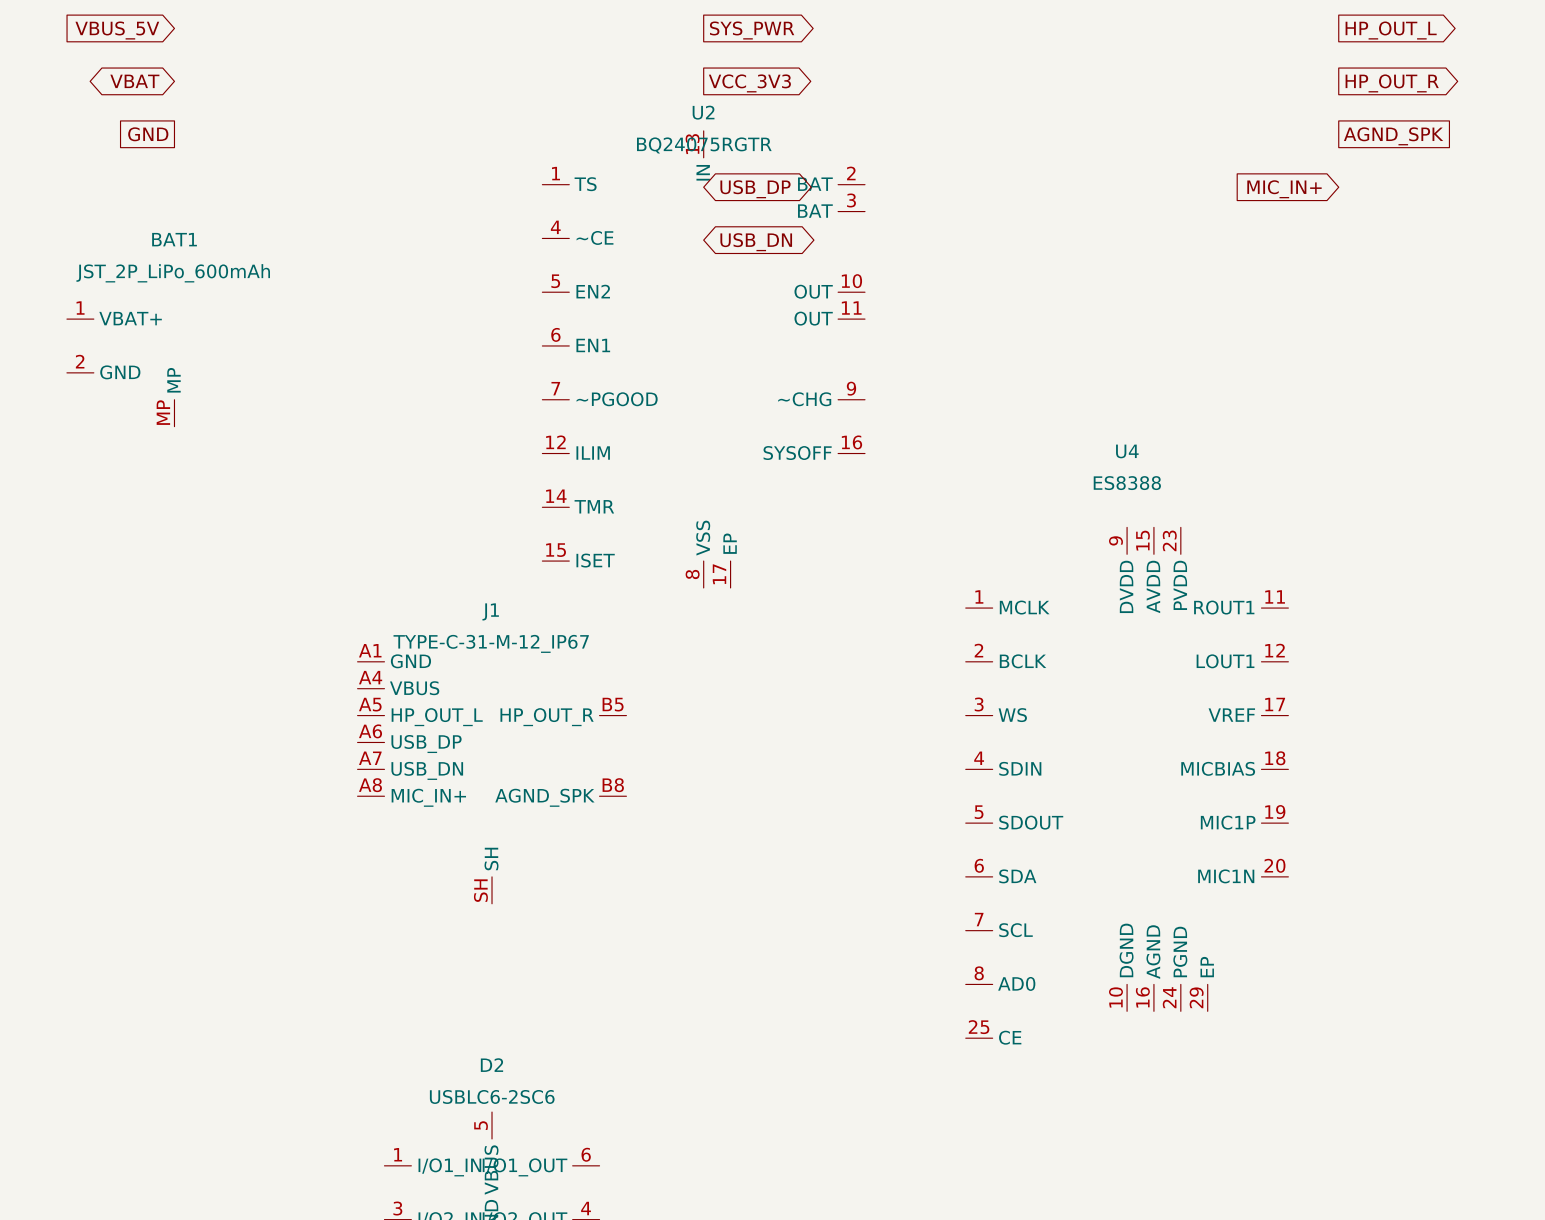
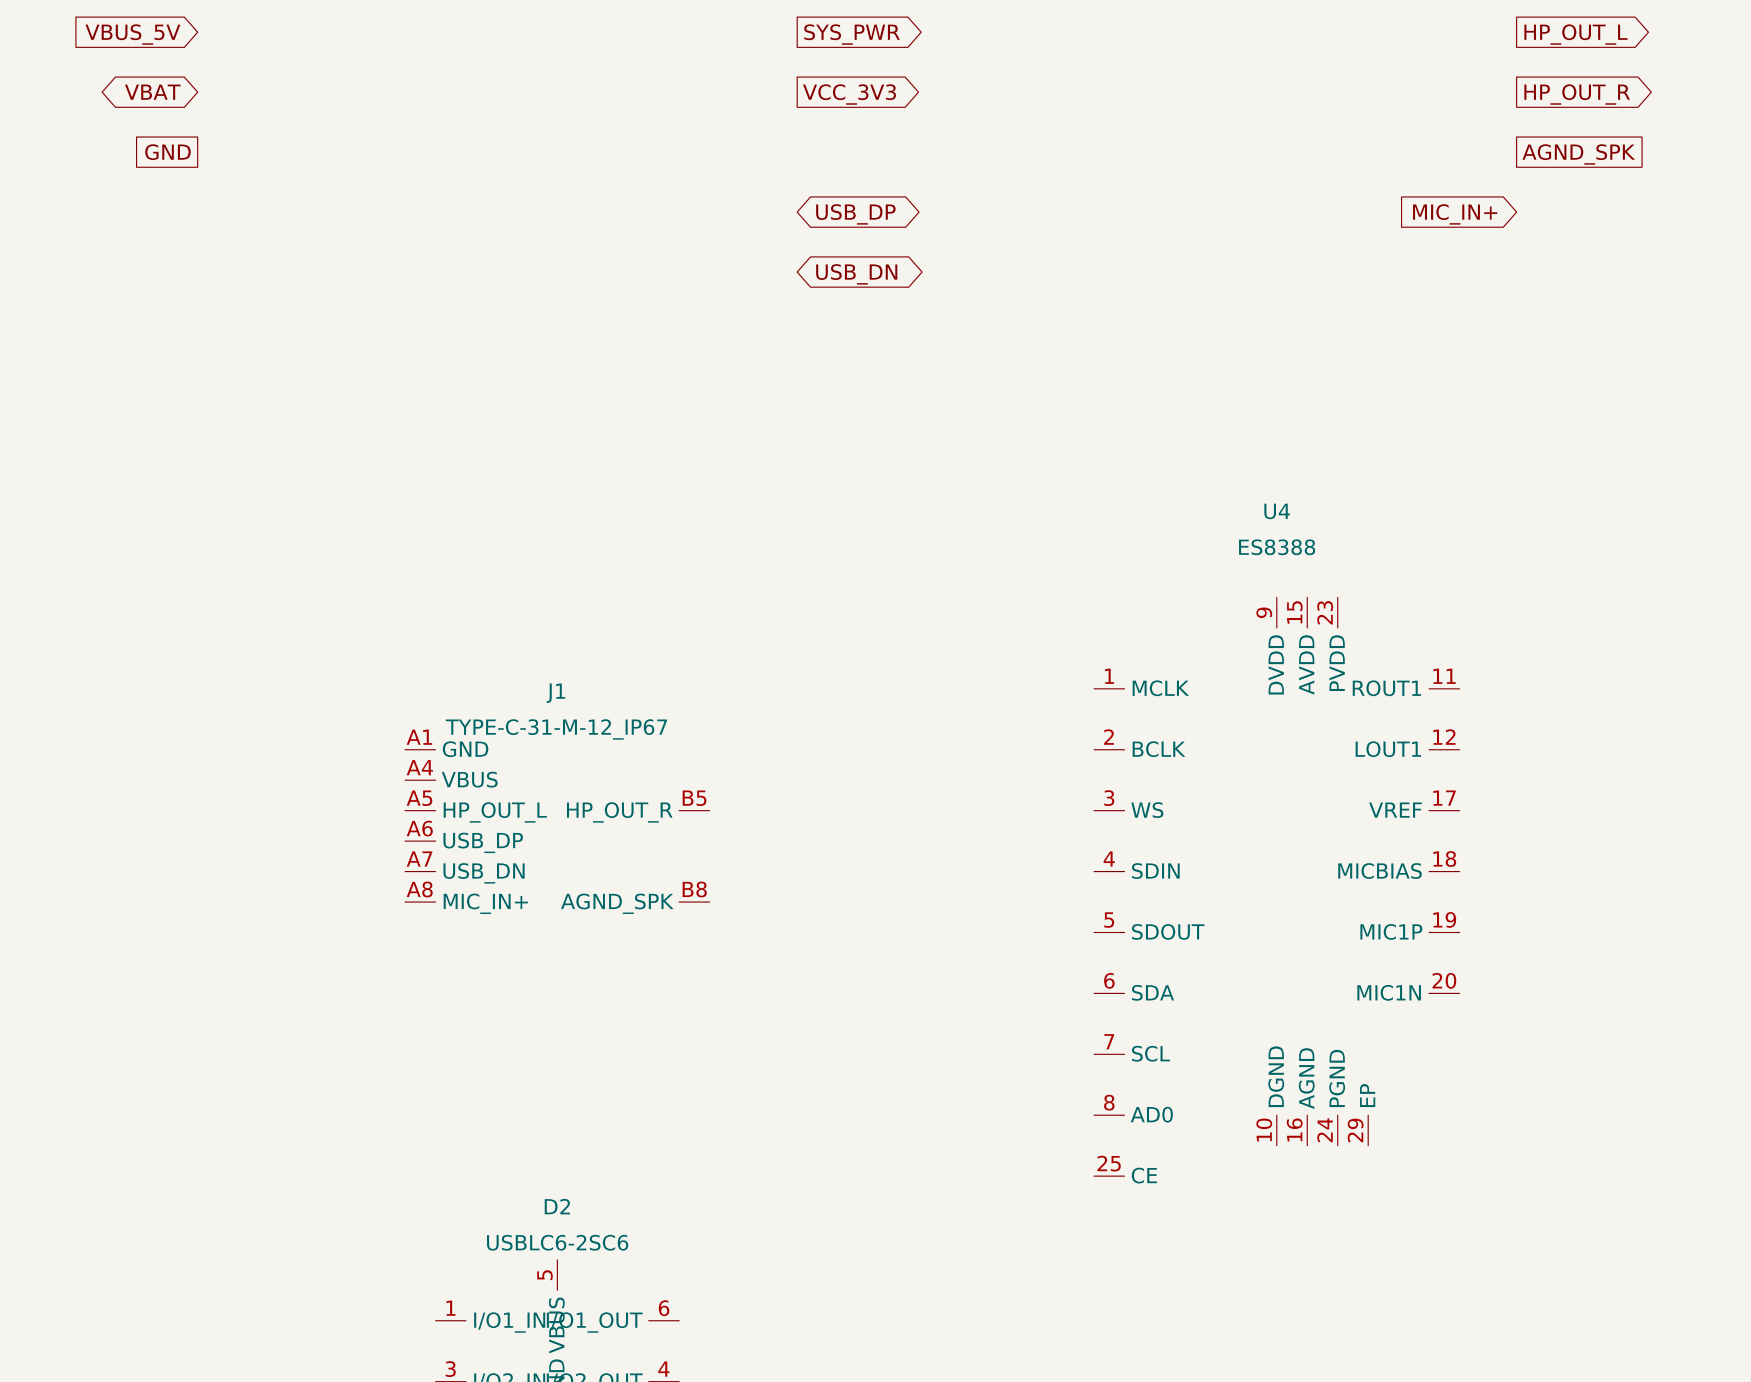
U2: BQ24075RGTR (703, 359) -> none
BAT1: JST_2P_LiPo_600mAh (120, 372) -> none
J1 symbol: [357, 661, 627, 904] -> [405, 749, 710, 903]

